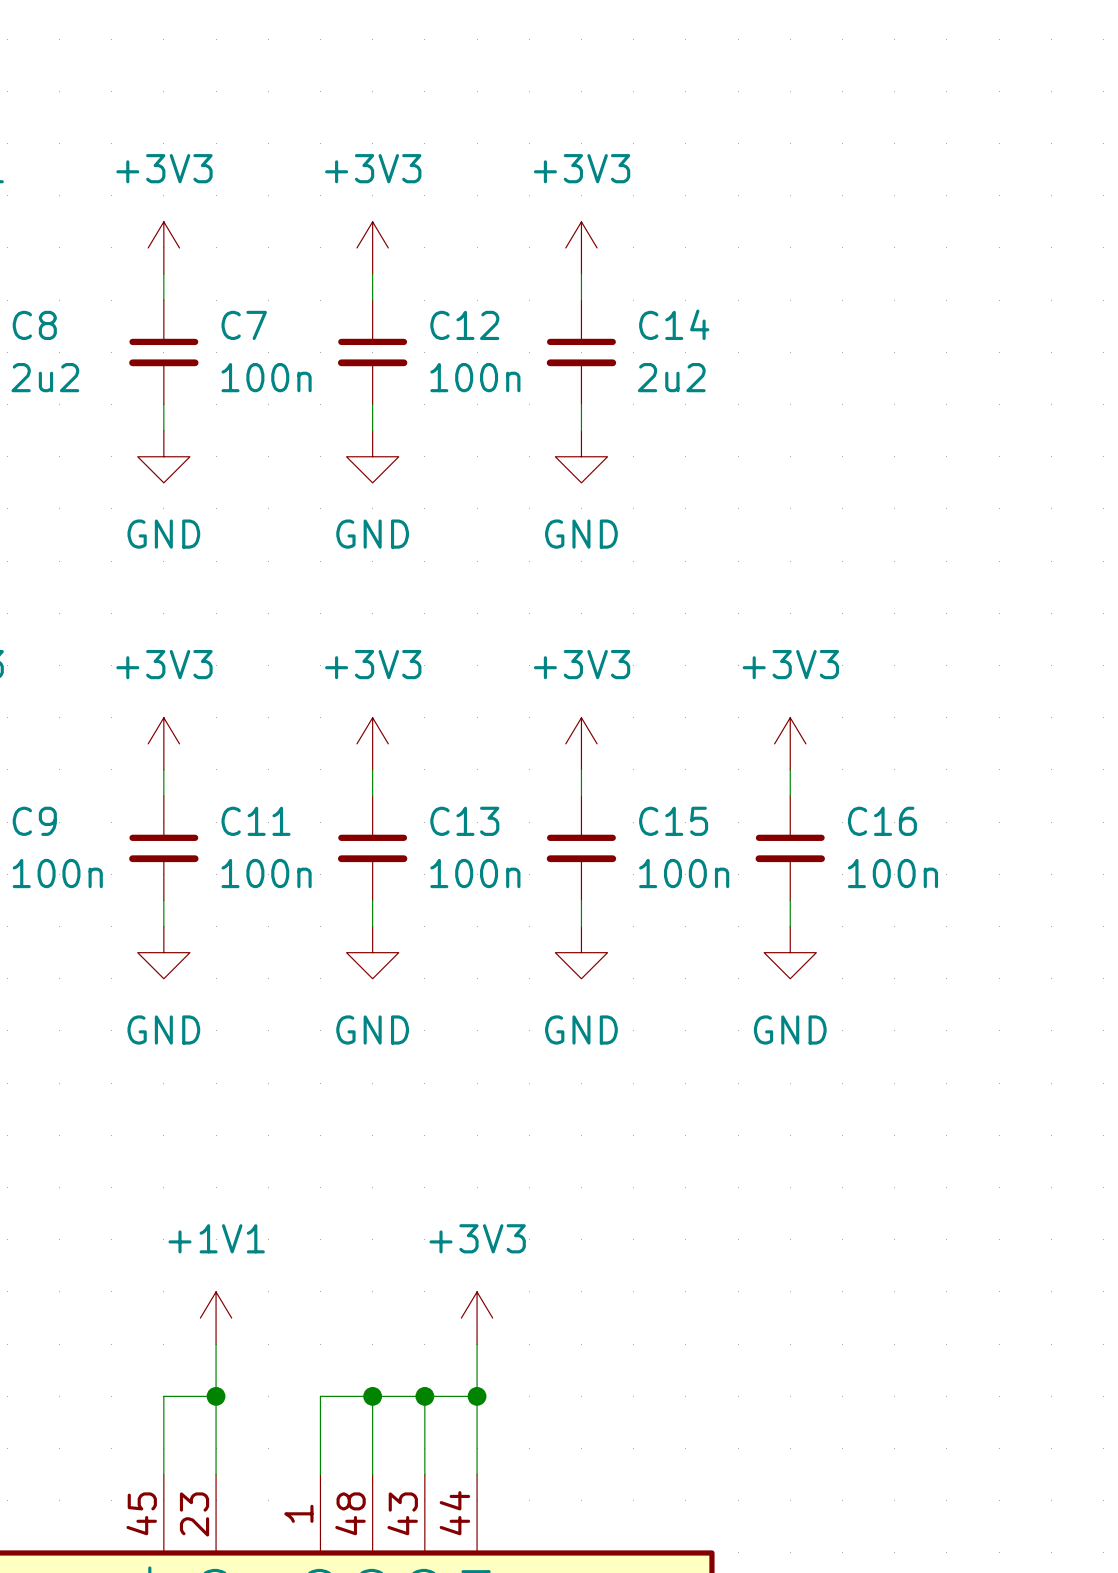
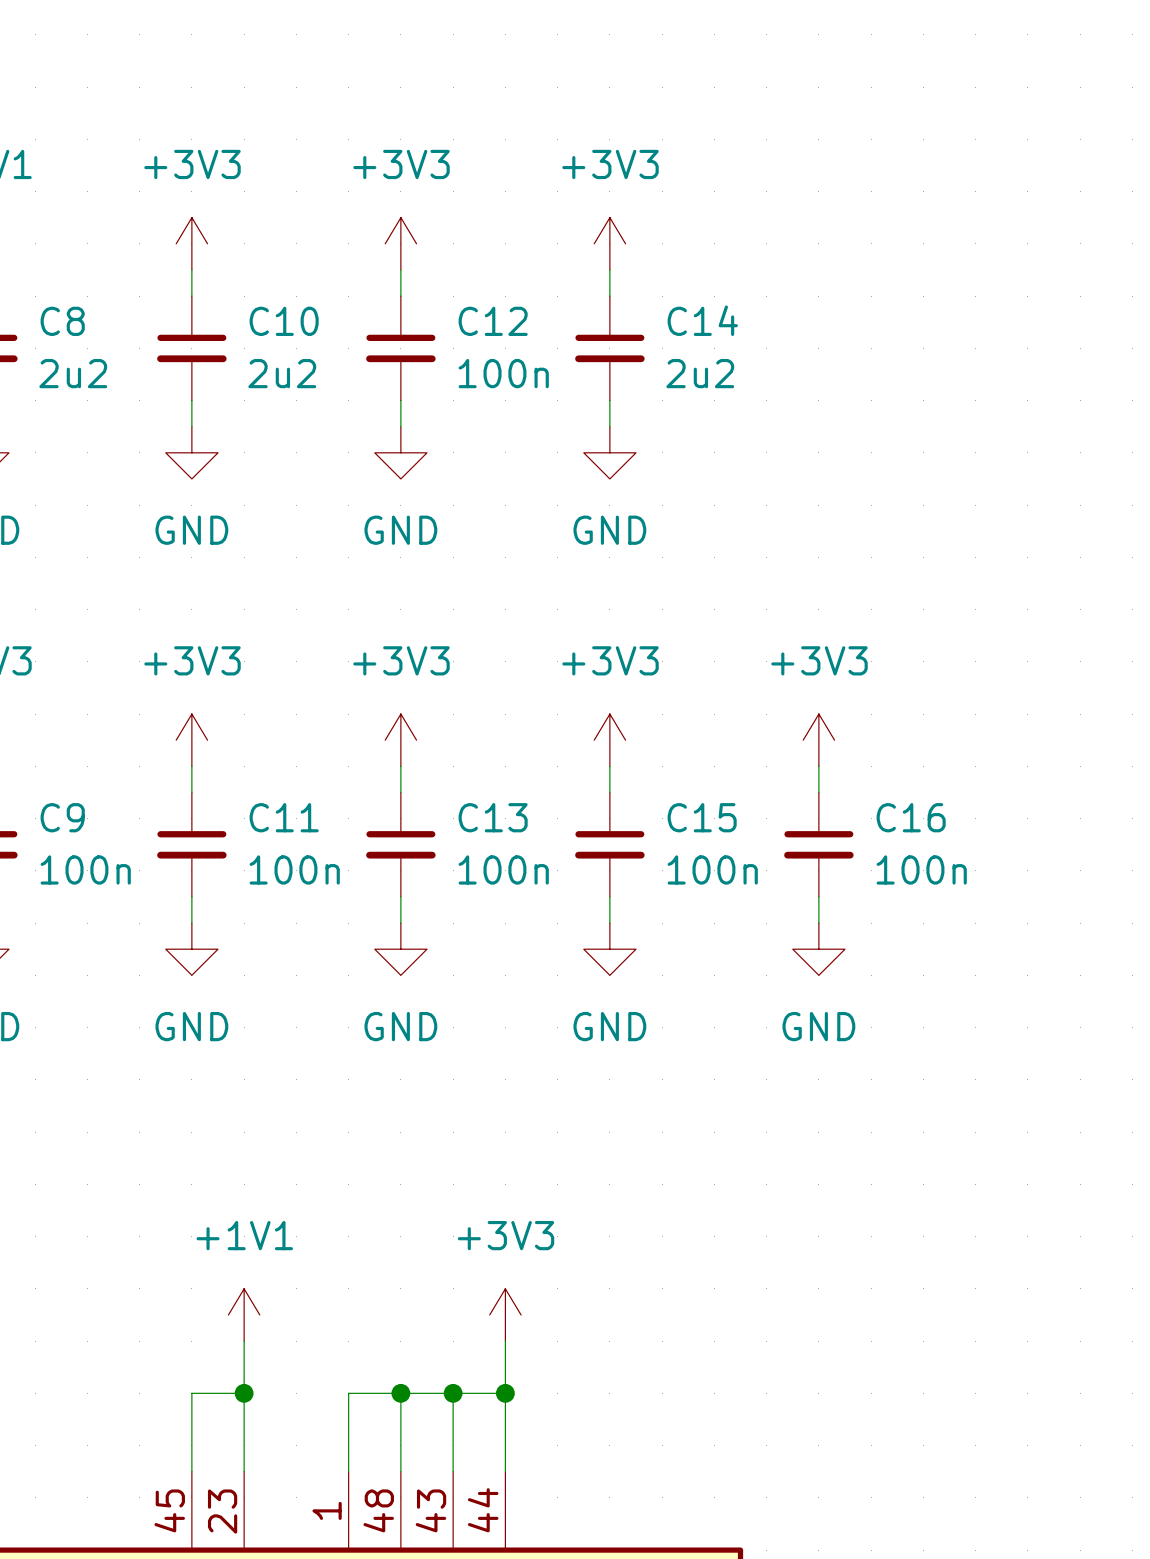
C7 name: C7 (244, 325) -> C10 (284, 321)
C7 value: 100n (266, 377) -> 2u2 (282, 373)

